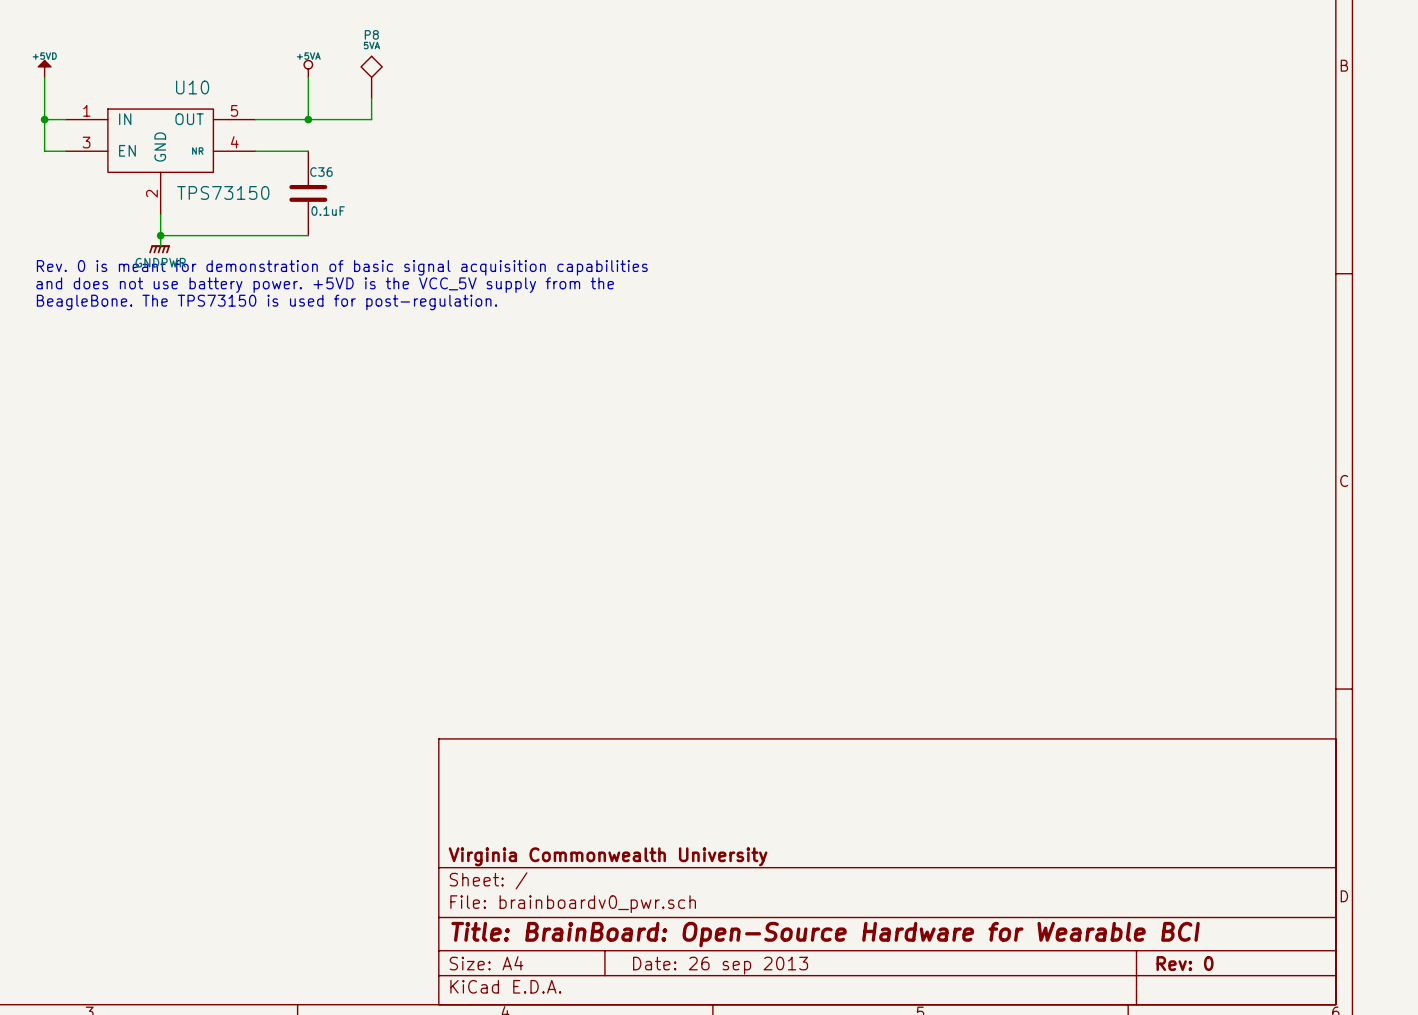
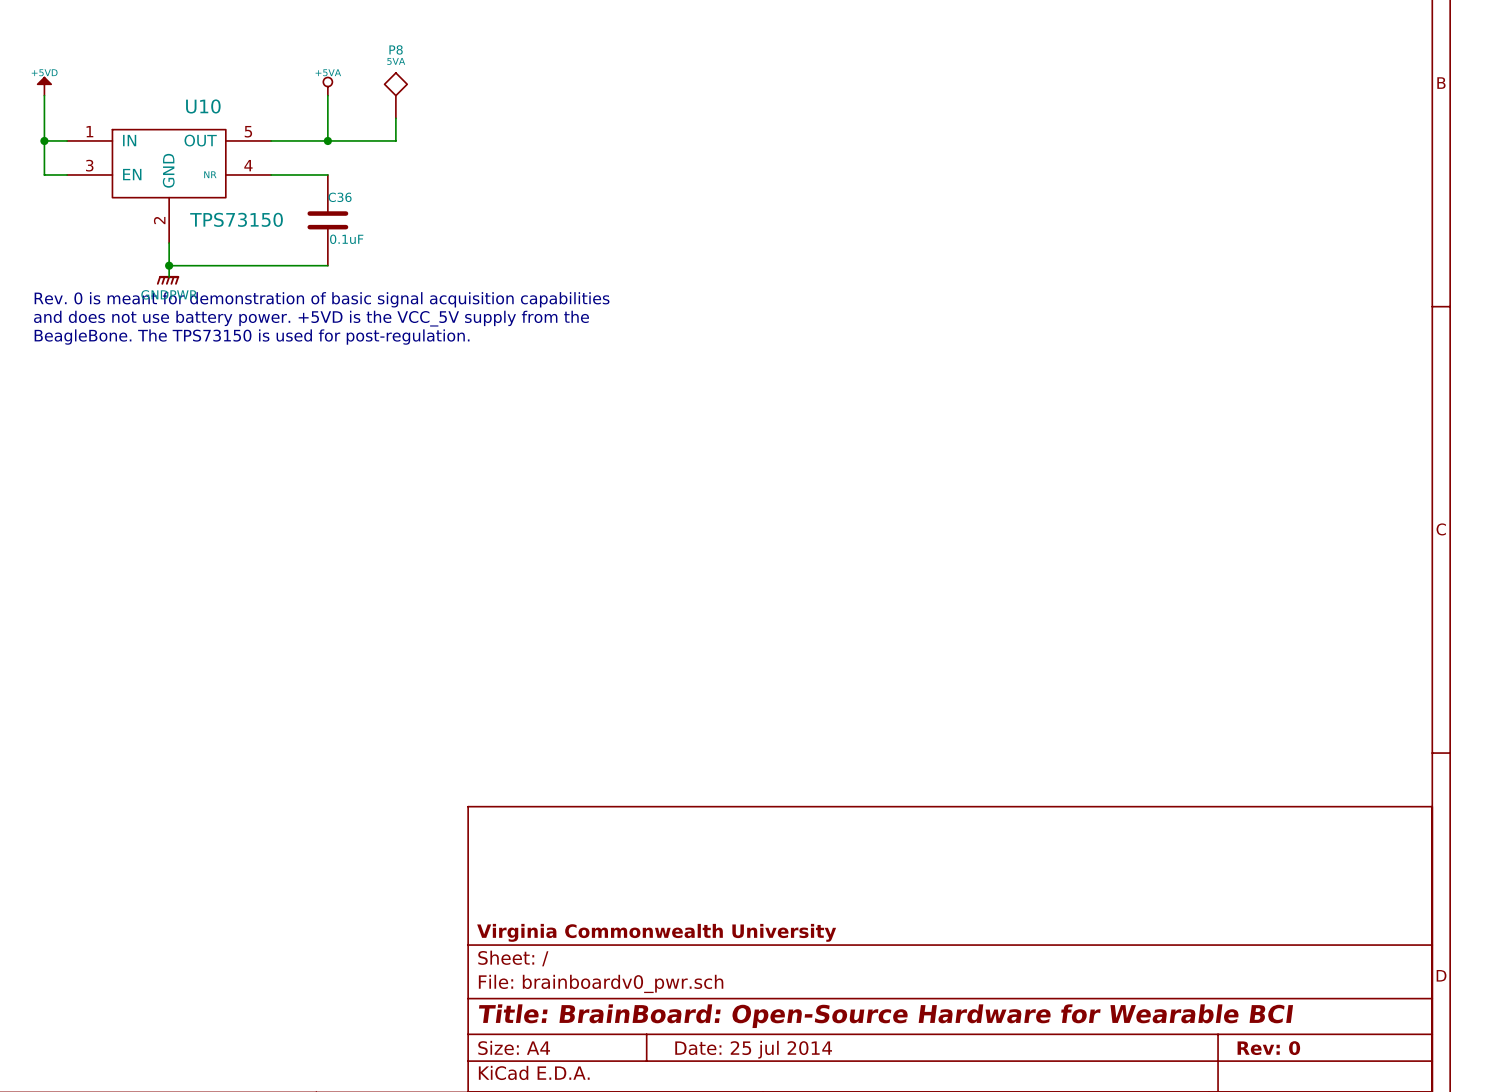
title block: Date: 26 sep 2013 (720, 965) -> Date: 25 jul 2014 (753, 1049)

